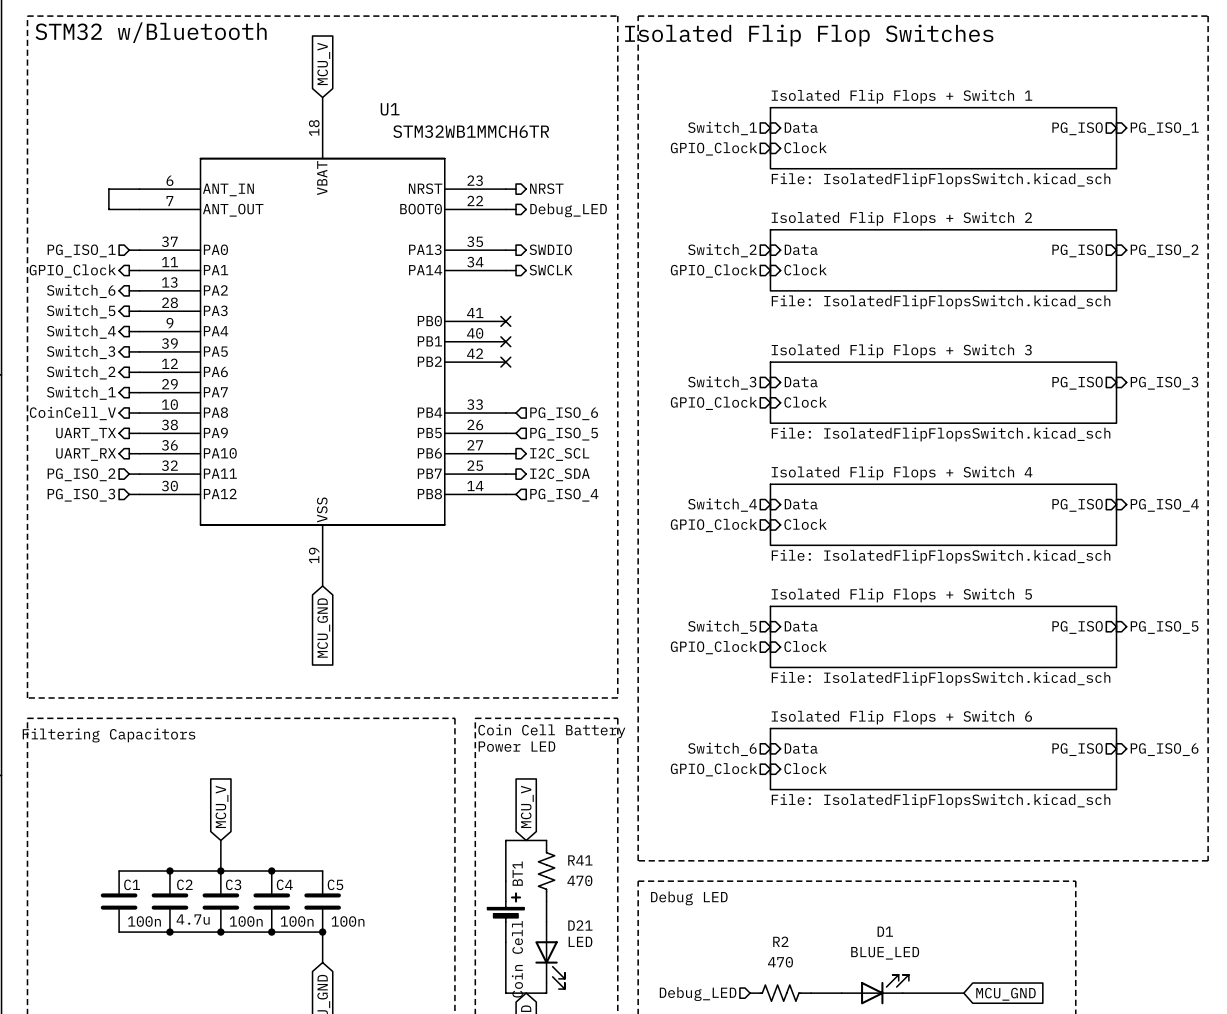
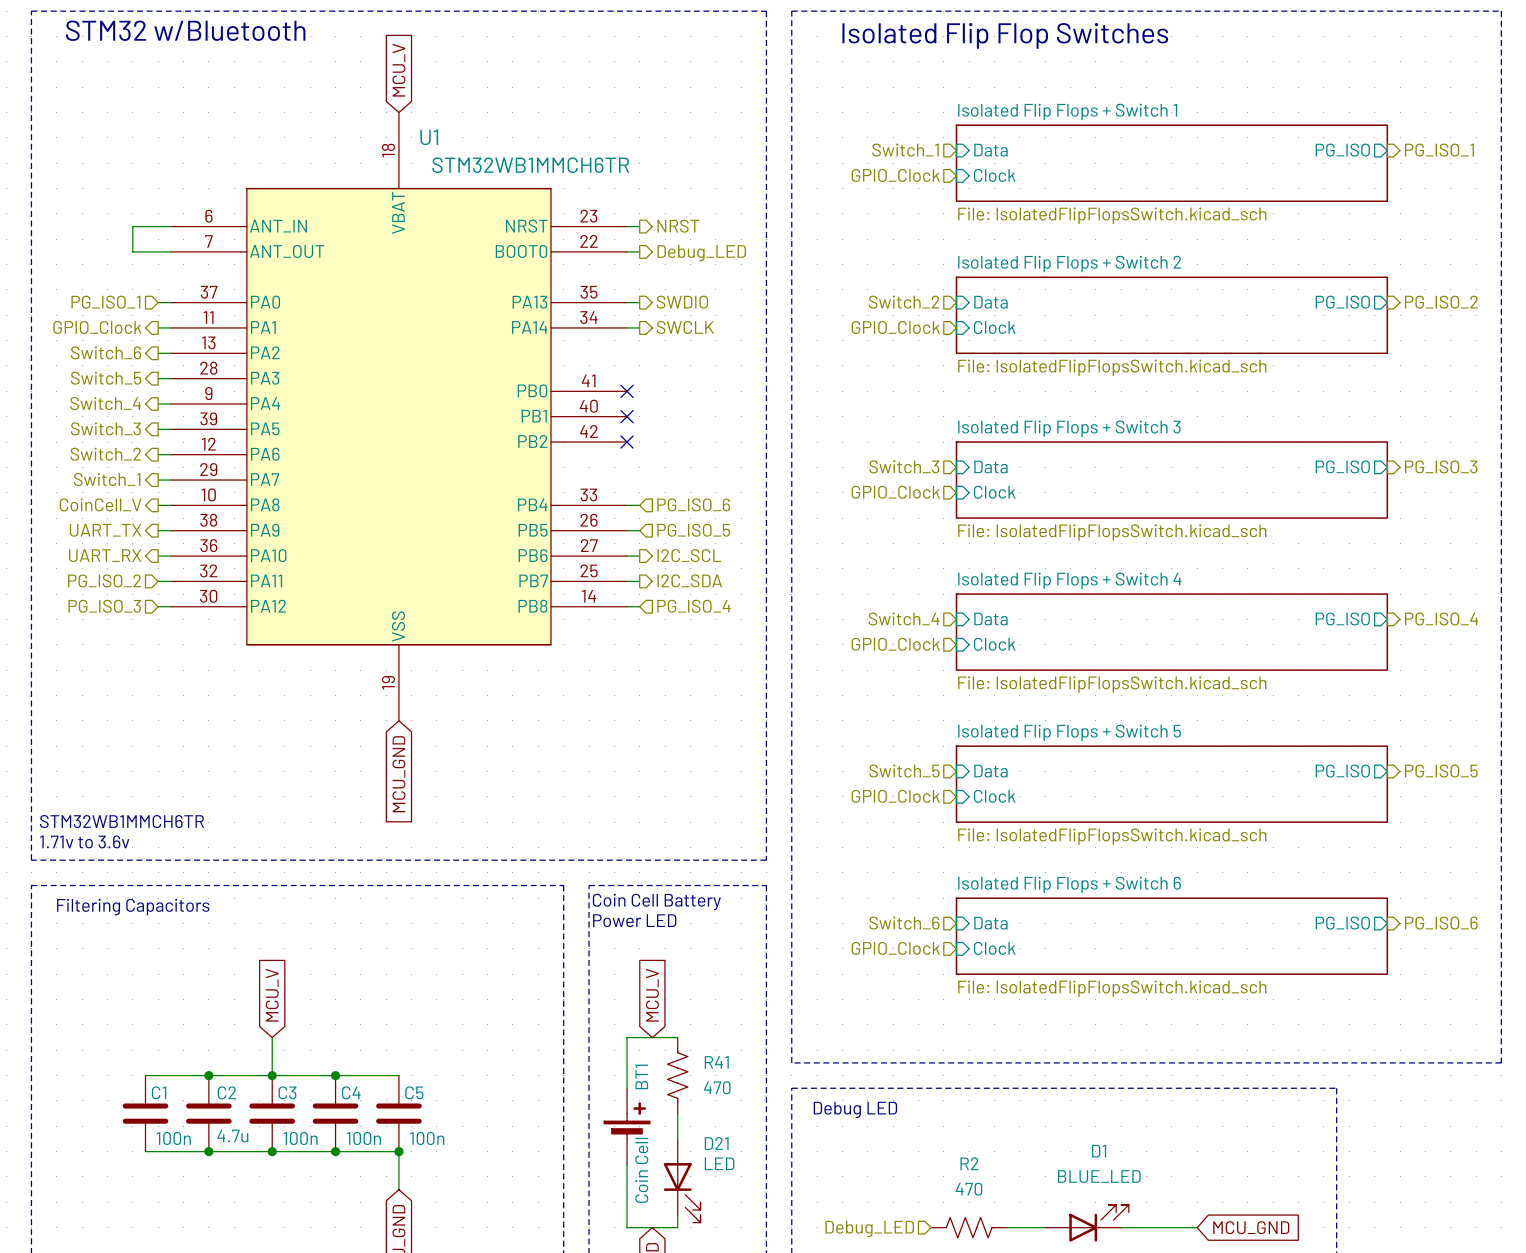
U1 name position: U1 (390, 109) -> U1 (429, 137)
U1 value position: STM32WB1MMCH6TR (471, 131) -> STM32WB1MMCH6TR (530, 165)
text: none -> STM32WB1MMCH6TR (122, 821)
text: none -> 1.71v to 3.6v (84, 841)

